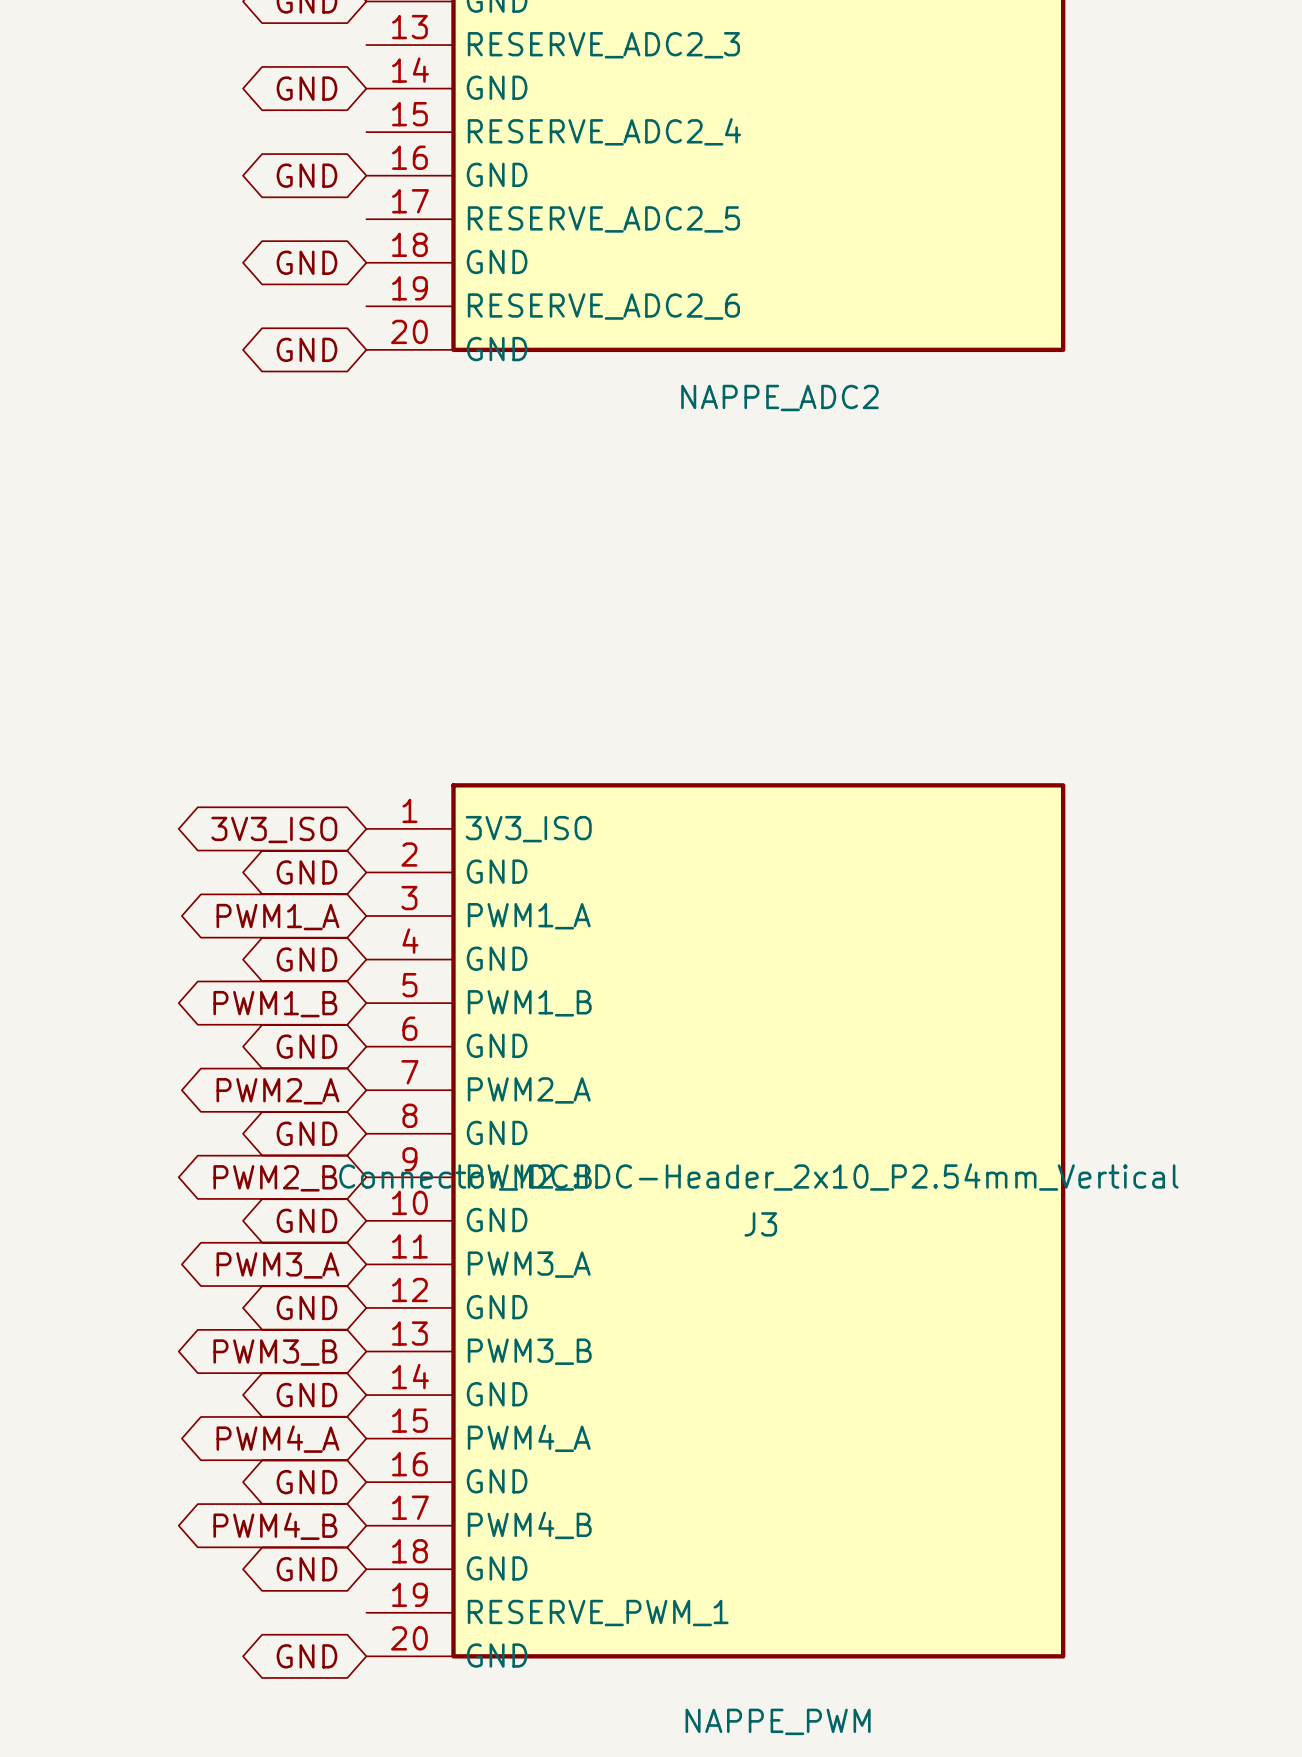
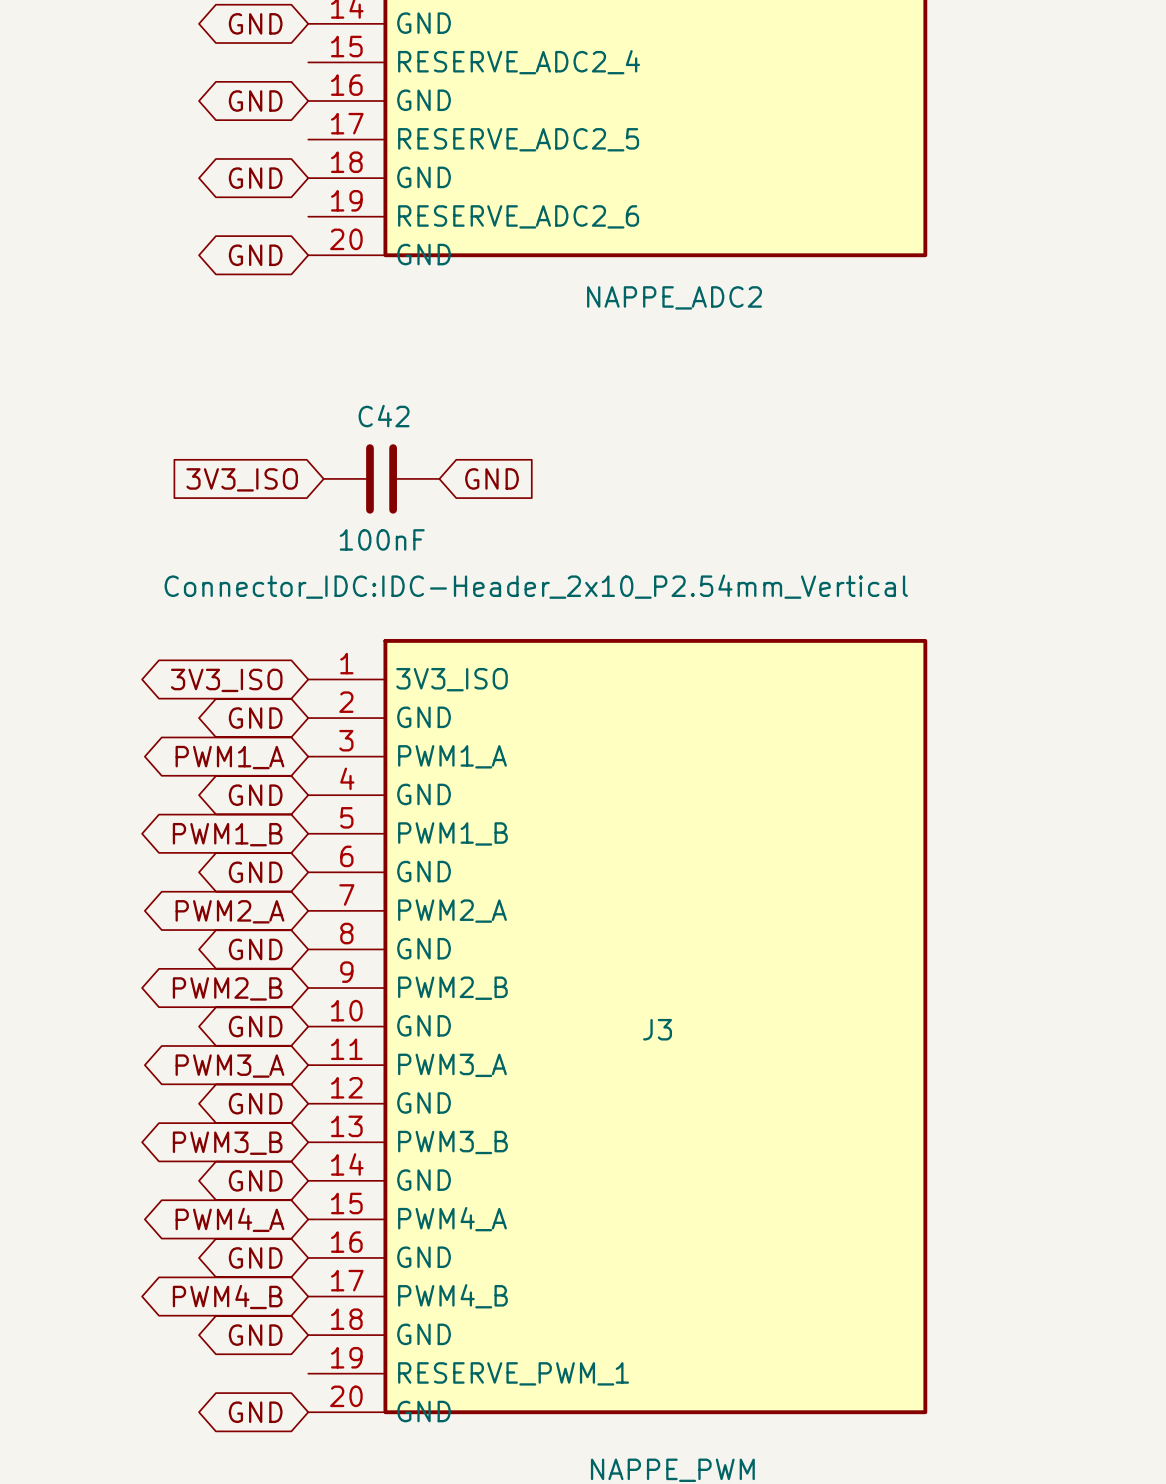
C42: none -> 100nF (381, 478)
global label: none -> GND (492, 478)
global label: none -> 3V3_ISO (242, 479)
J3 text position: Connector_IDC:IDC-Header_2x10_P2.54mm_Vertical (758, 1177) -> Connector_IDC:IDC-Header_2x10_P2.54mm_Vertical (536, 586)

